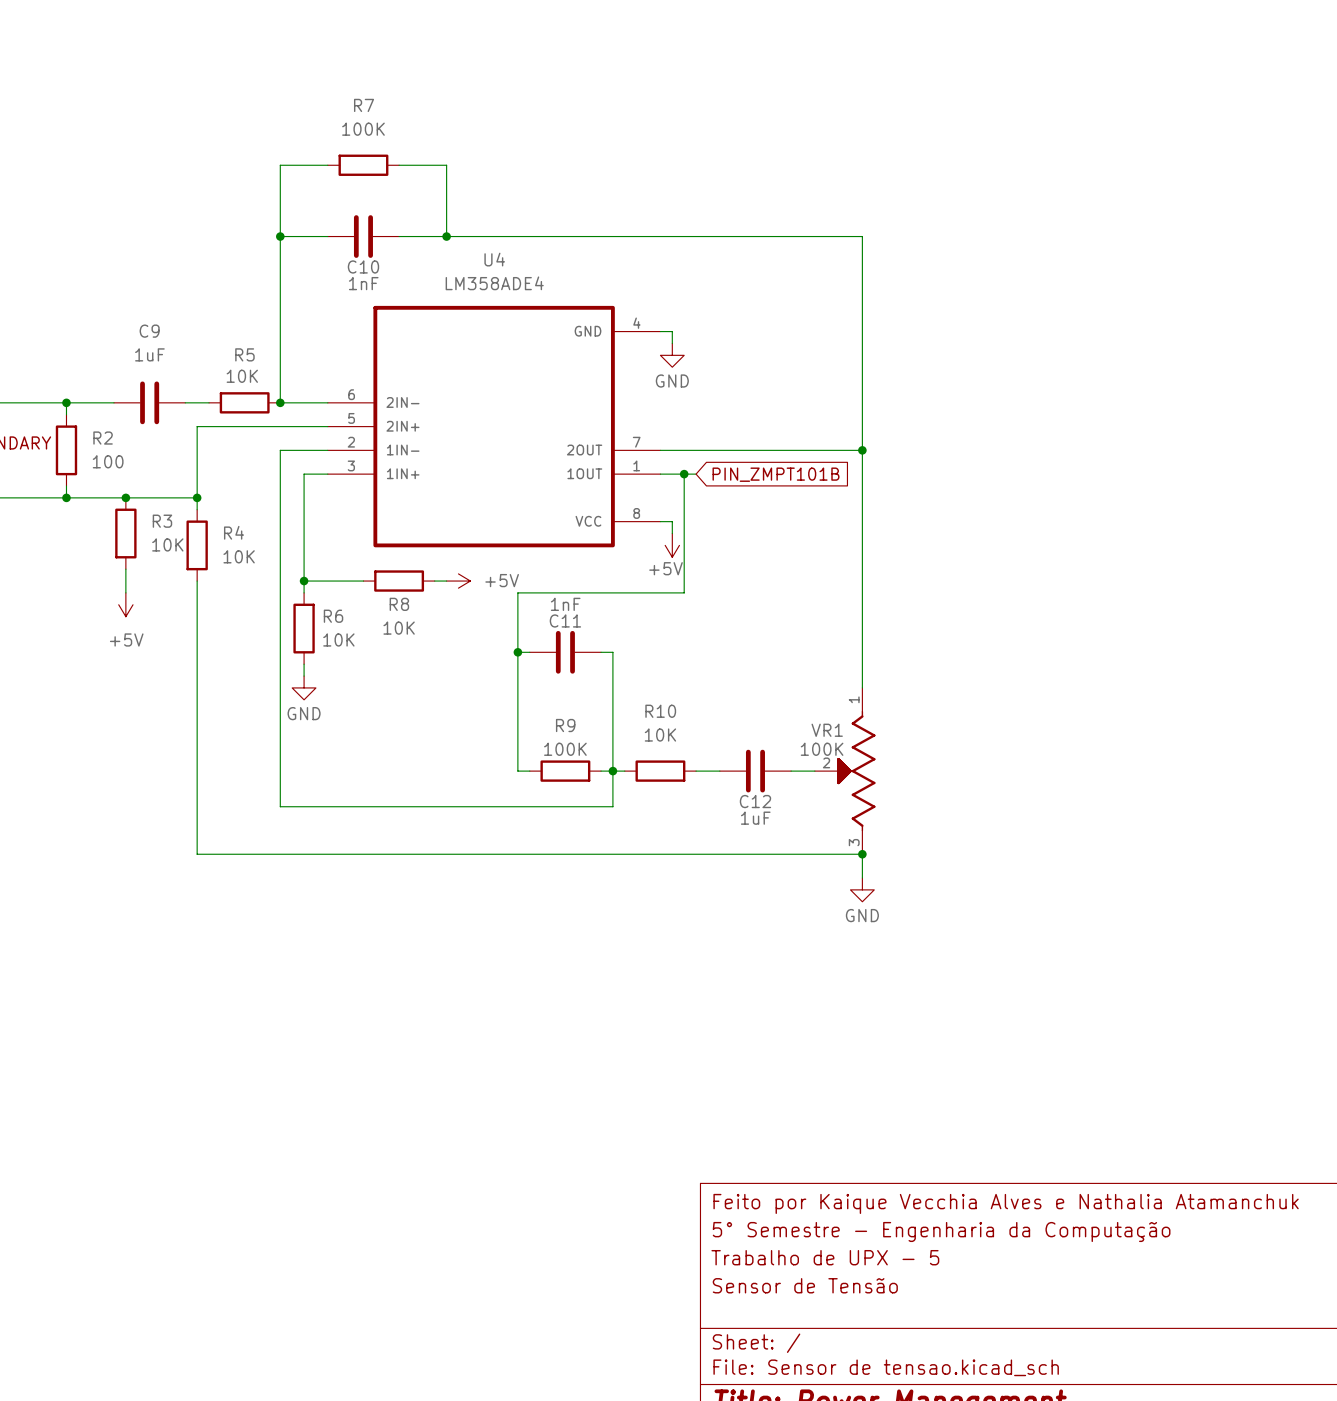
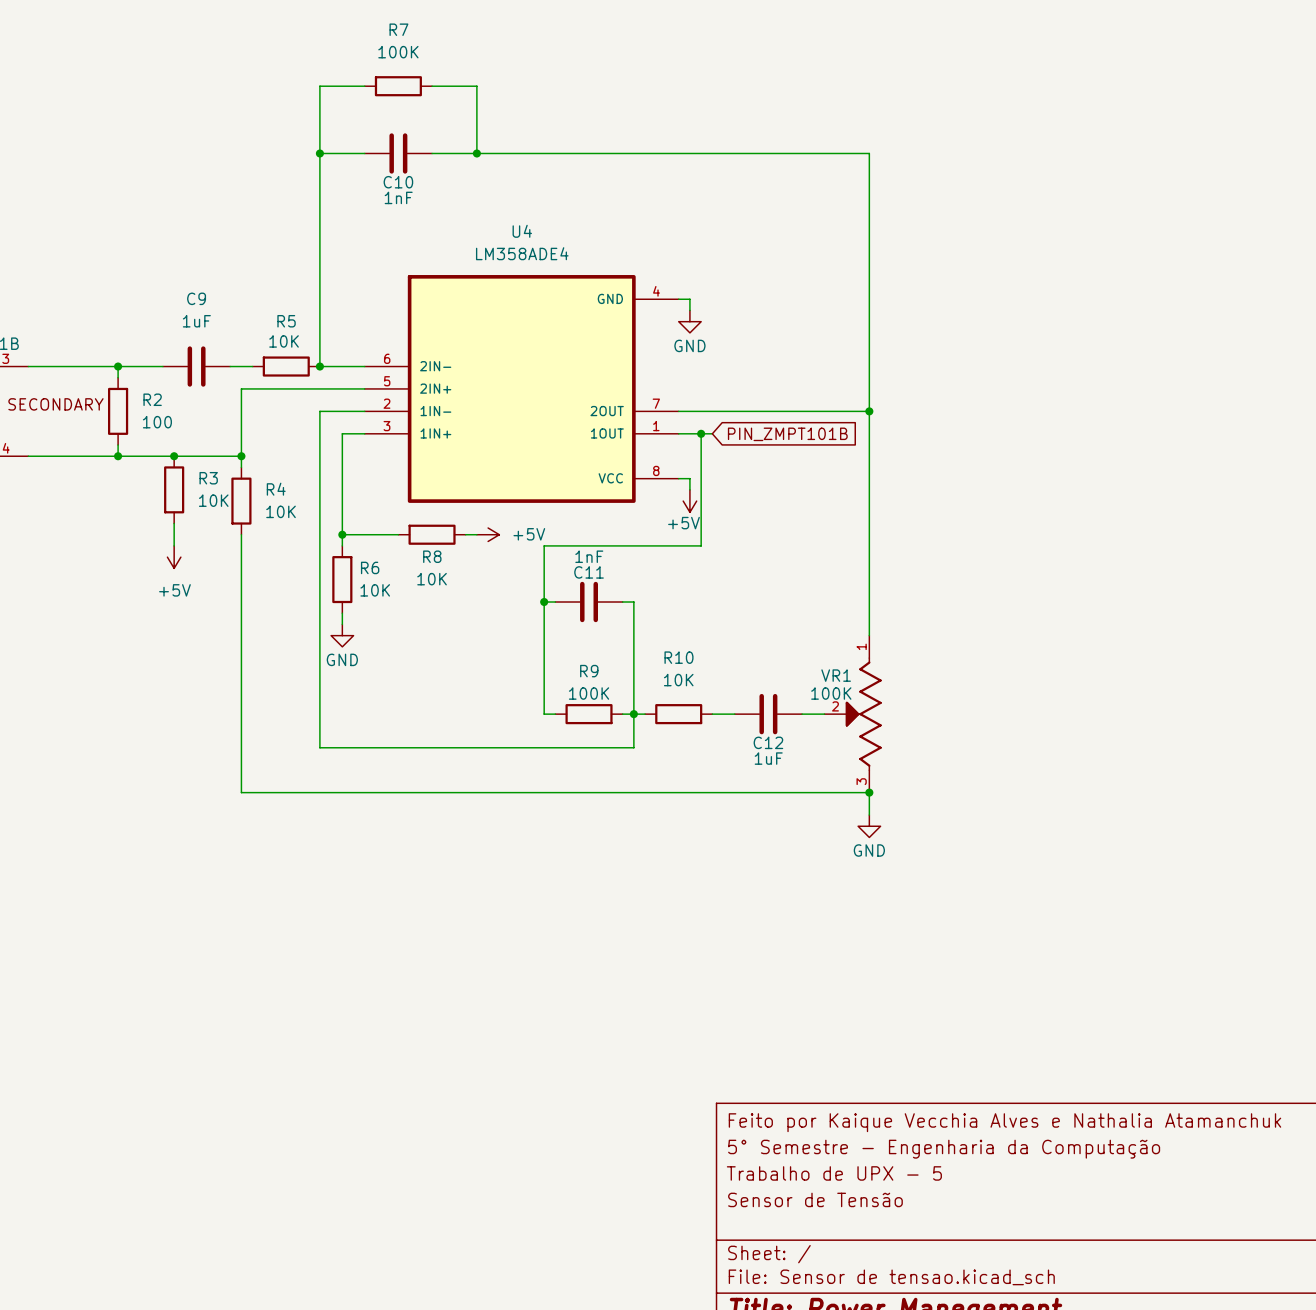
wire: (280, 165) (327, 165) -> (319, 142) (319, 86) (364, 86)
R7 position: (363, 165) -> (398, 86)
wire: (399, 165) (446, 165) -> (432, 86) (476, 86) (476, 142)
junction: none -> (319, 153)
wire: (446, 177) (446, 236) -> none
junction: none -> (476, 153)
wire: (280, 236) (327, 236) -> (319, 153) (364, 153)
junction: (280, 236) -> none
C10 position: (363, 236) -> (398, 153)
wire: (399, 236) (862, 236) -> (432, 153) (869, 153) (869, 209)
junction: (446, 236) -> none

